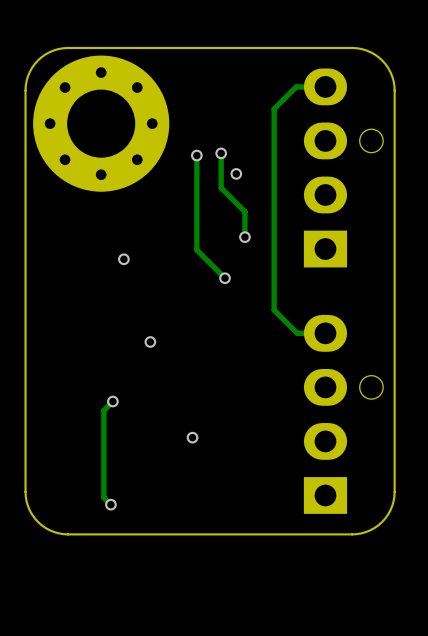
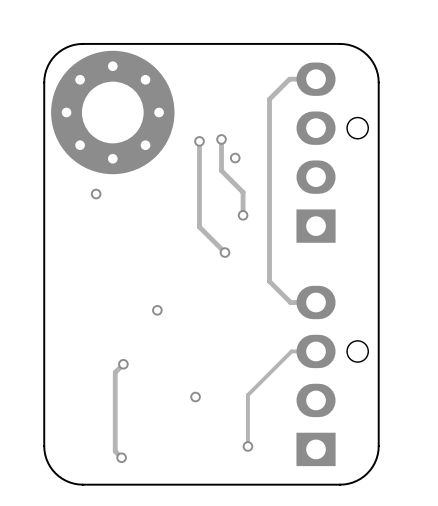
via position: (123, 259) -> (96, 194)
track: none -> (316, 351) (291, 351) (247, 395) (247, 446)
via: none -> (247, 446)

